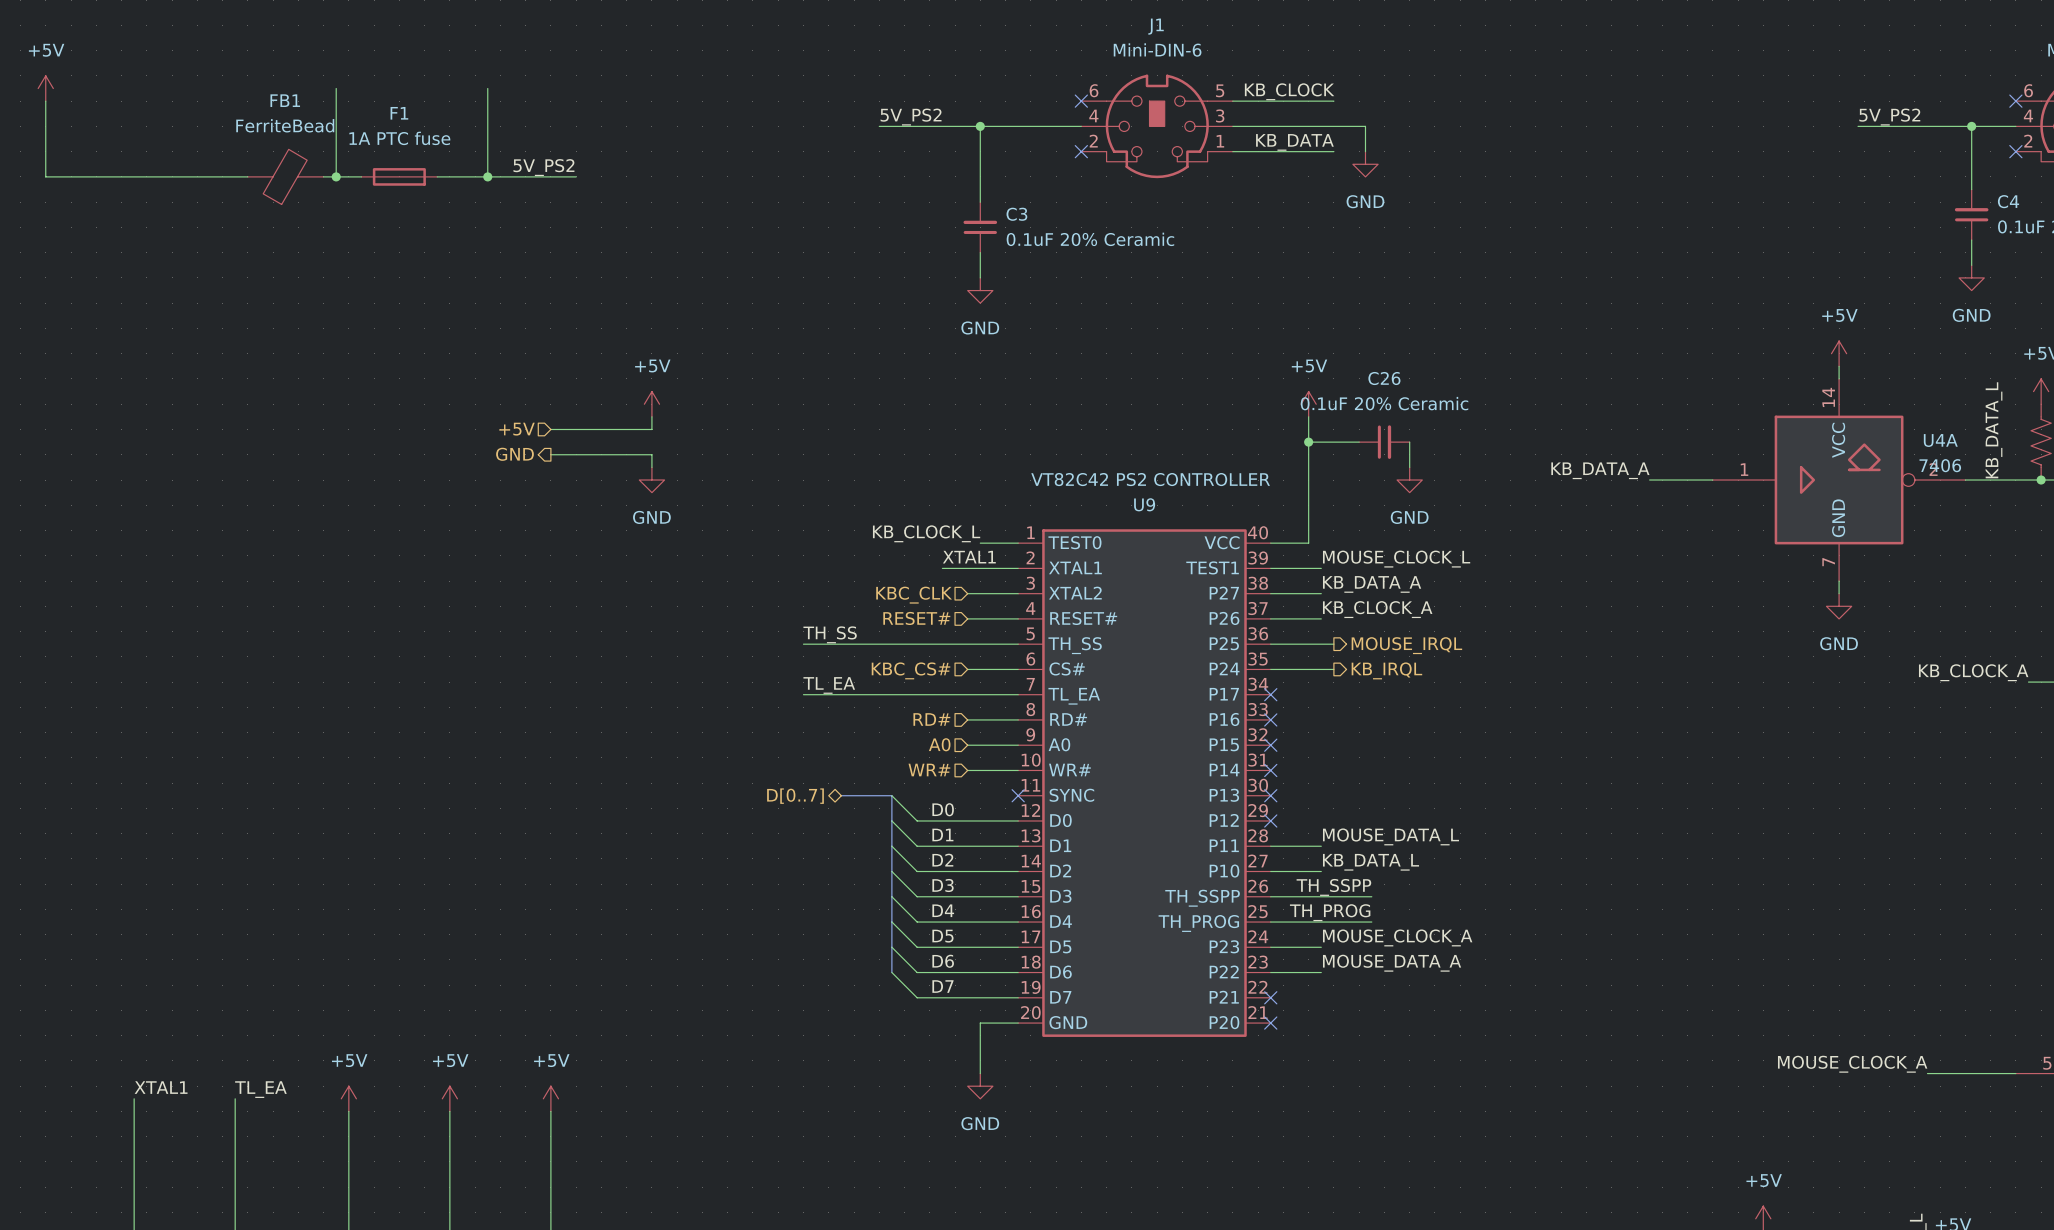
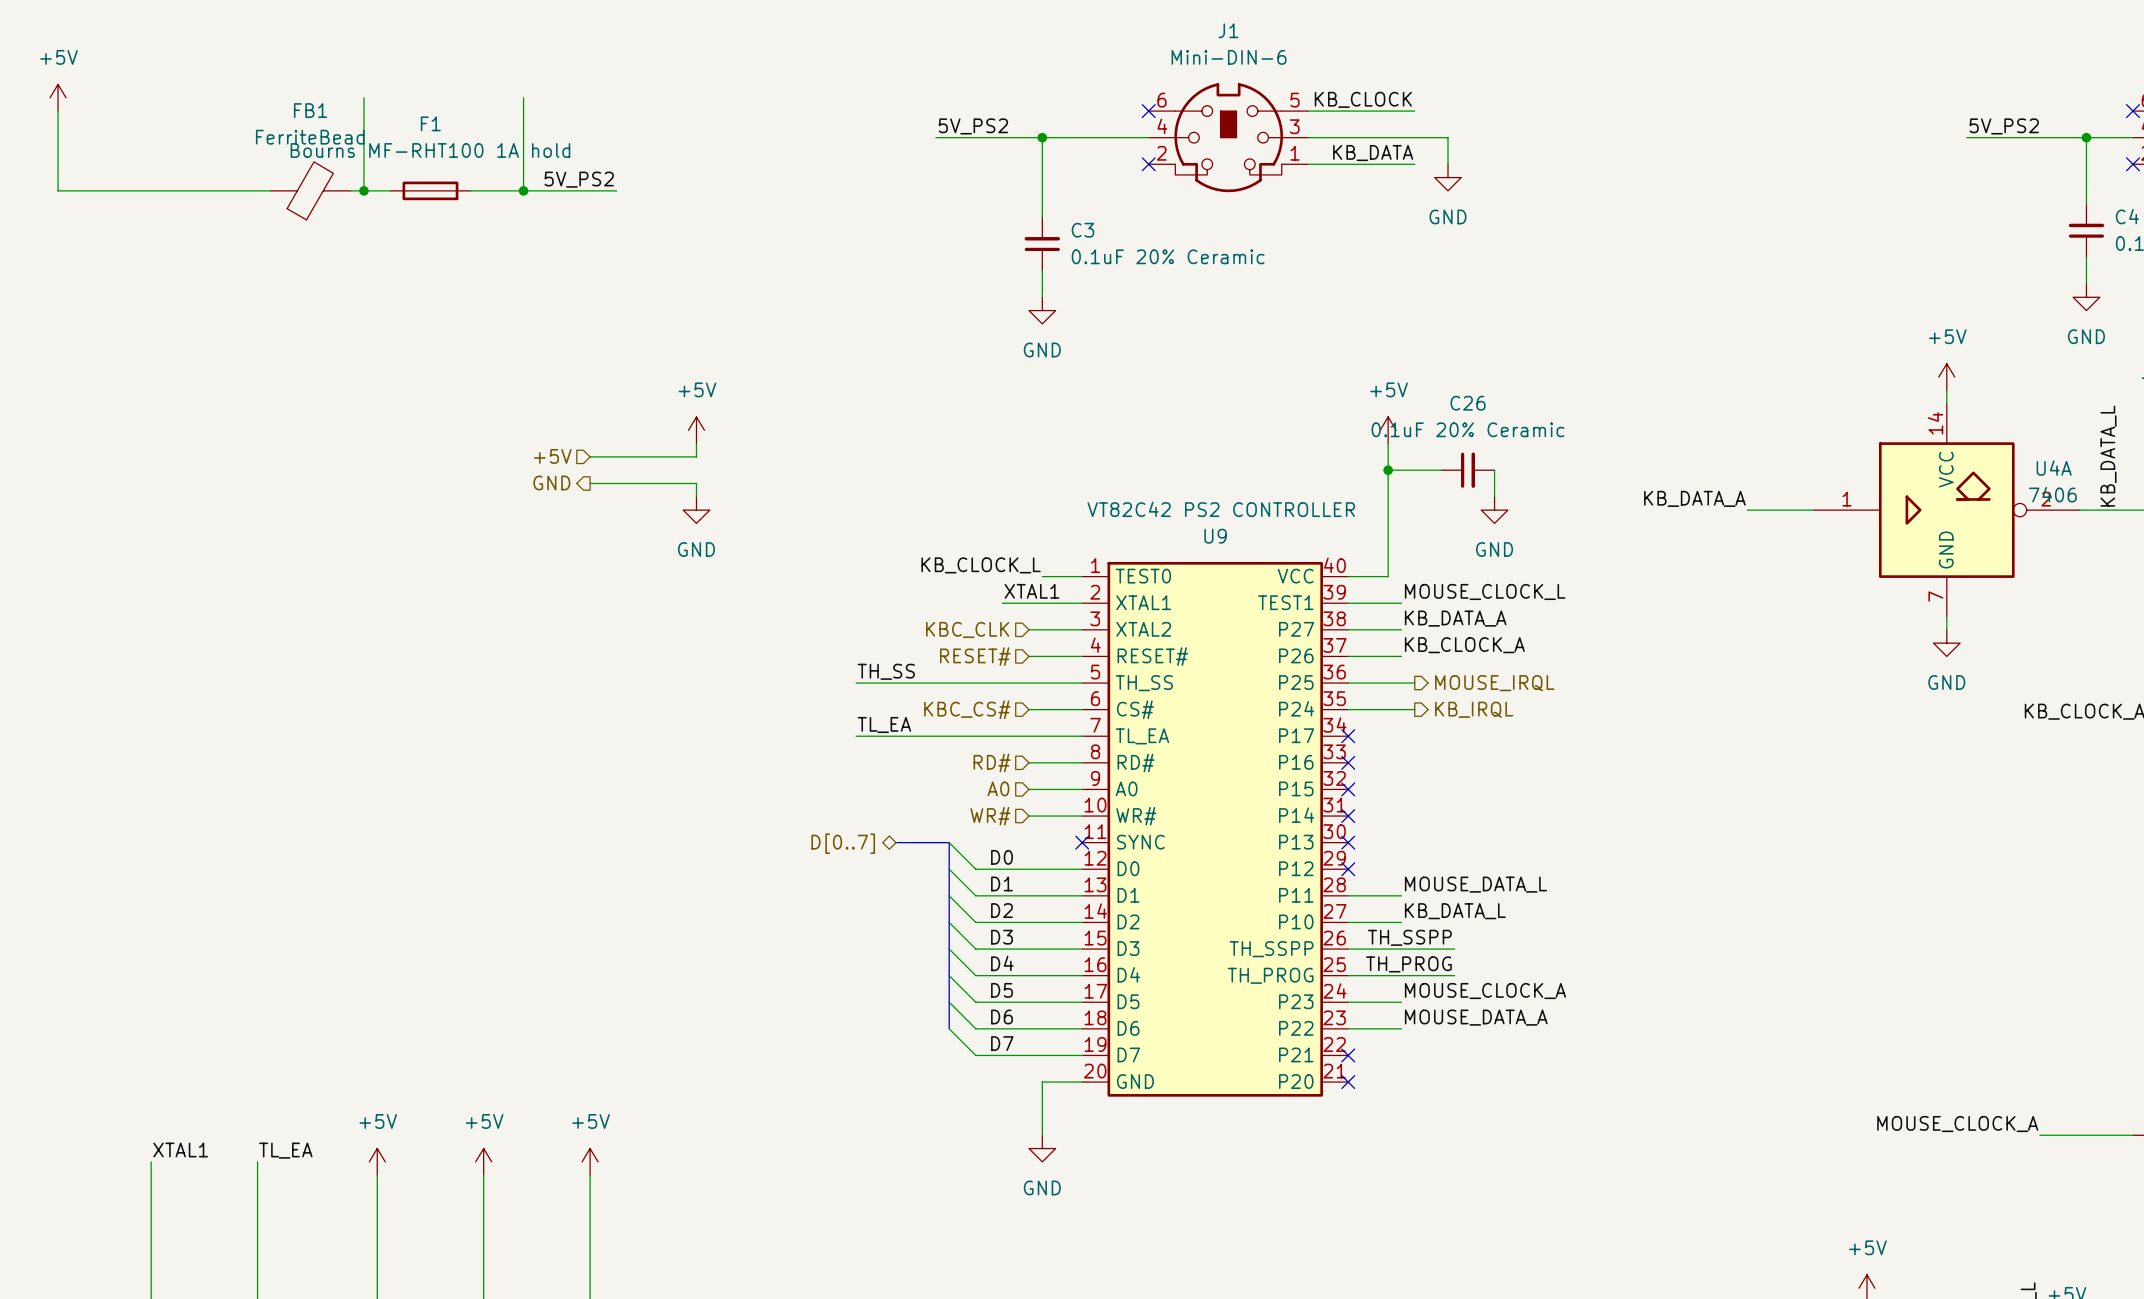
F1 value: 1A PTC fuse (399, 138) -> Bourns MF-RHT100 1A hold (430, 150)

